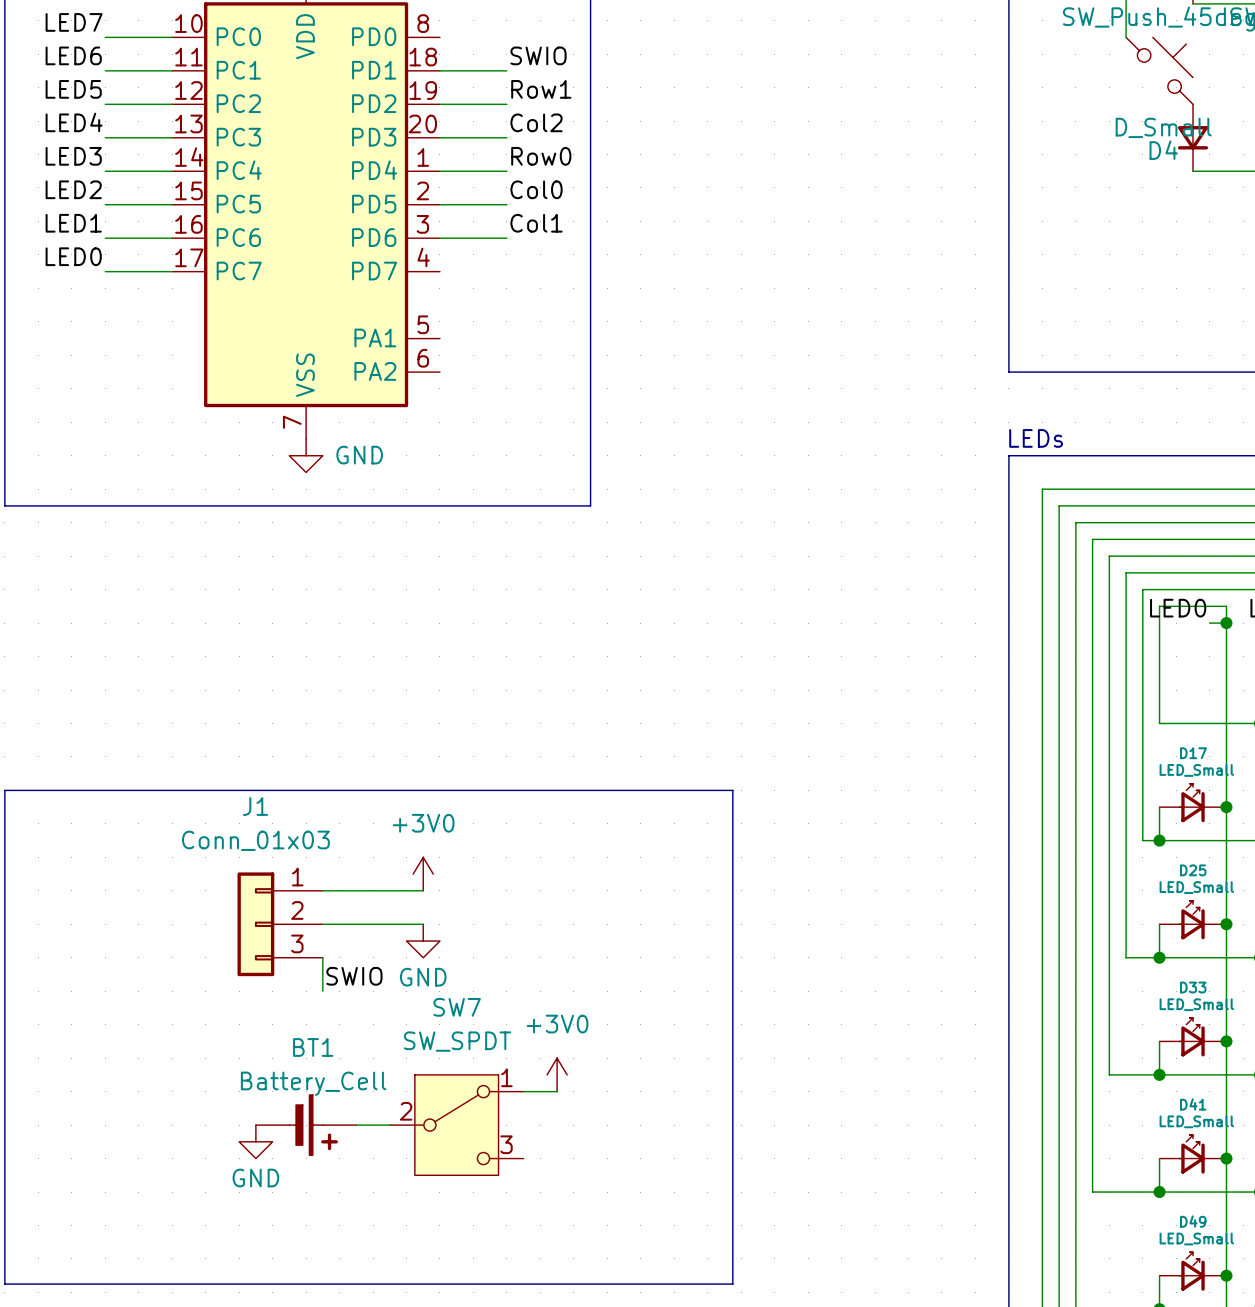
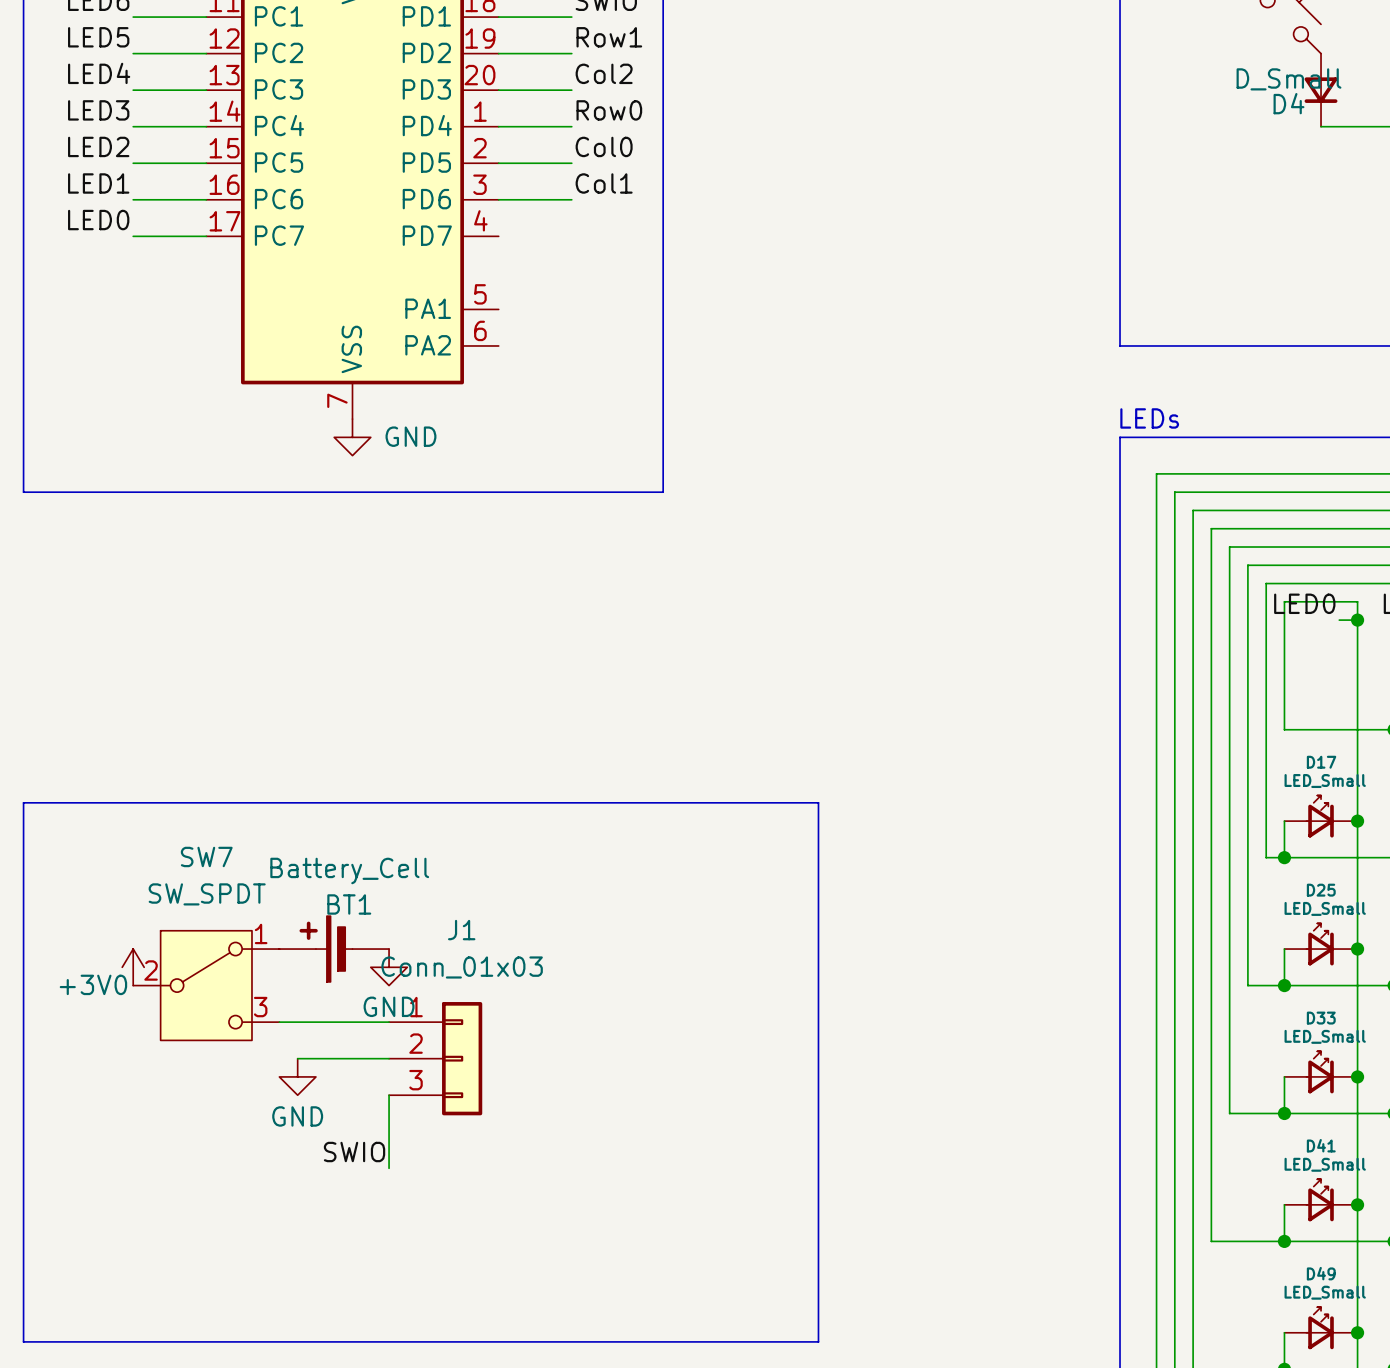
power symbol: +3V0 (423, 874) -> none
wire: (322, 890) (423, 890) -> none
J1 flip: as is (255, 924) -> left-right (462, 1058)
J1 position: (280, 924) -> (435, 1058)
wire: (322, 924) (423, 924) -> (279, 1022) (389, 1022)
power symbol: none -> +3V0 (133, 967)
power symbol position: GND (423, 941) -> GND (389, 967)
wire: (322, 957) (322, 991) -> none
label position: SWIO (354, 976) -> SWIO (354, 1152)
wire: none -> (297, 1058) (389, 1058)
power symbol: none -> GND (297, 1076)
BT1 name position: BT1 (313, 1047) -> BT1 (349, 904)
wire: none -> (389, 1095) (389, 1168)
power symbol: +3V0 (557, 1074) -> none
BT1 value position: Battery_Cell (313, 1083) -> Battery_Cell (349, 870)
wire: (523, 1091) (557, 1091) -> none
BT1 position: (306, 1125) -> (334, 949)
BT1 rotation: 0° (313, 1125) -> 180° (326, 949)
wire: (356, 1125) (389, 1125) -> none
SW7 position: (456, 1125) -> (206, 985)
power symbol: GND (255, 1141) -> none

